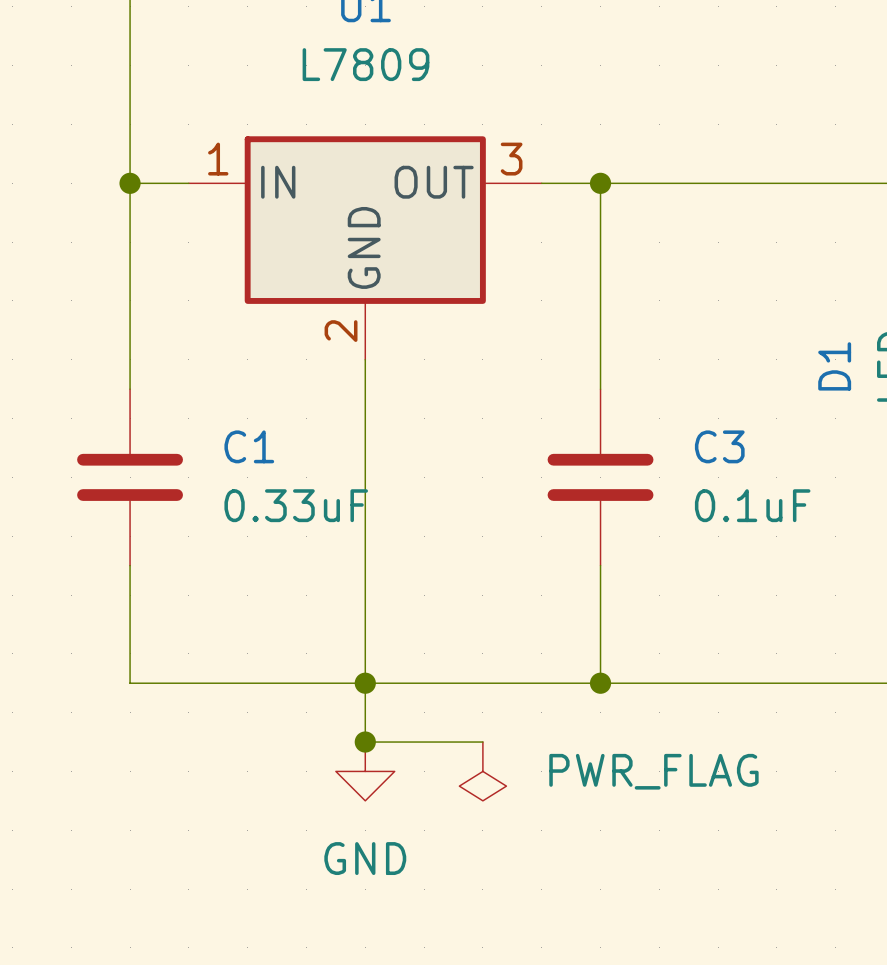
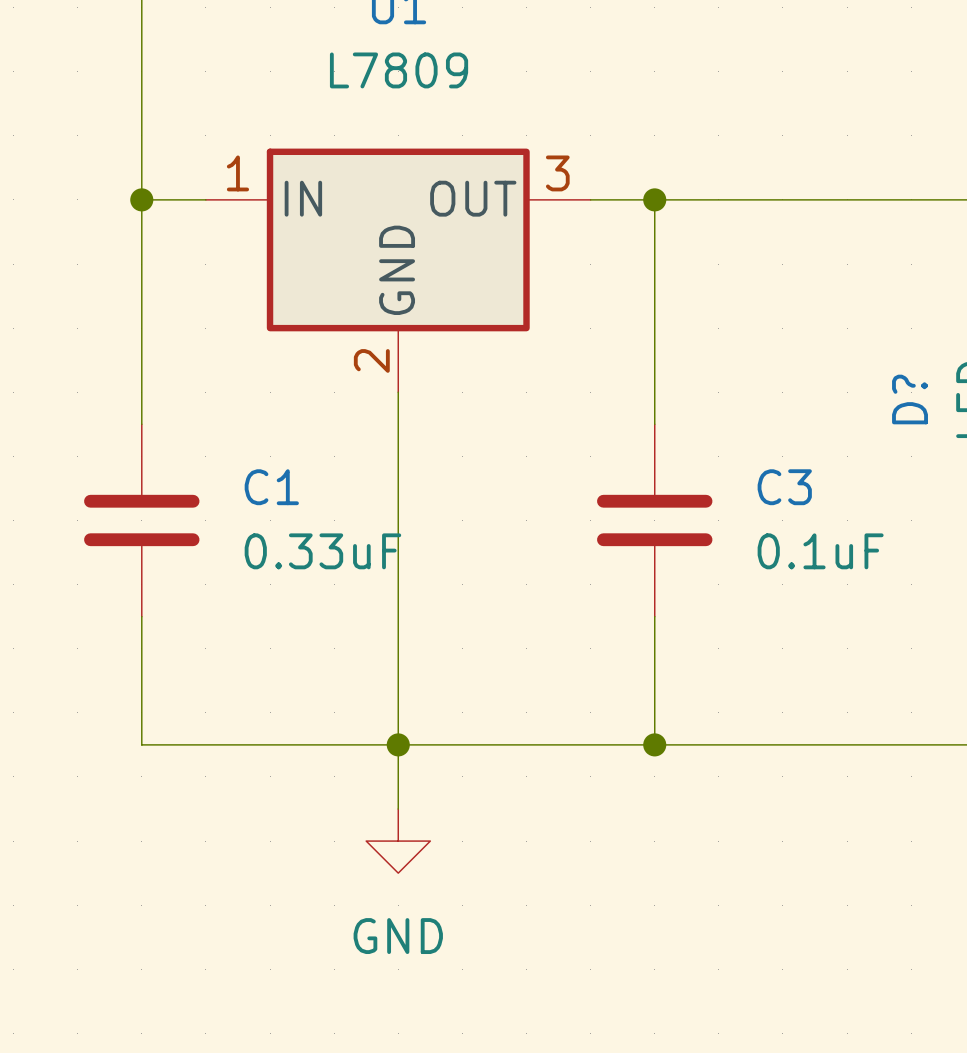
D1 name: D1 (834, 366) -> D? (910, 399)
wire: (365, 742) (482, 742) -> none
junction: (365, 742) -> none
power symbol: PWR_FLAG (482, 771) -> none

